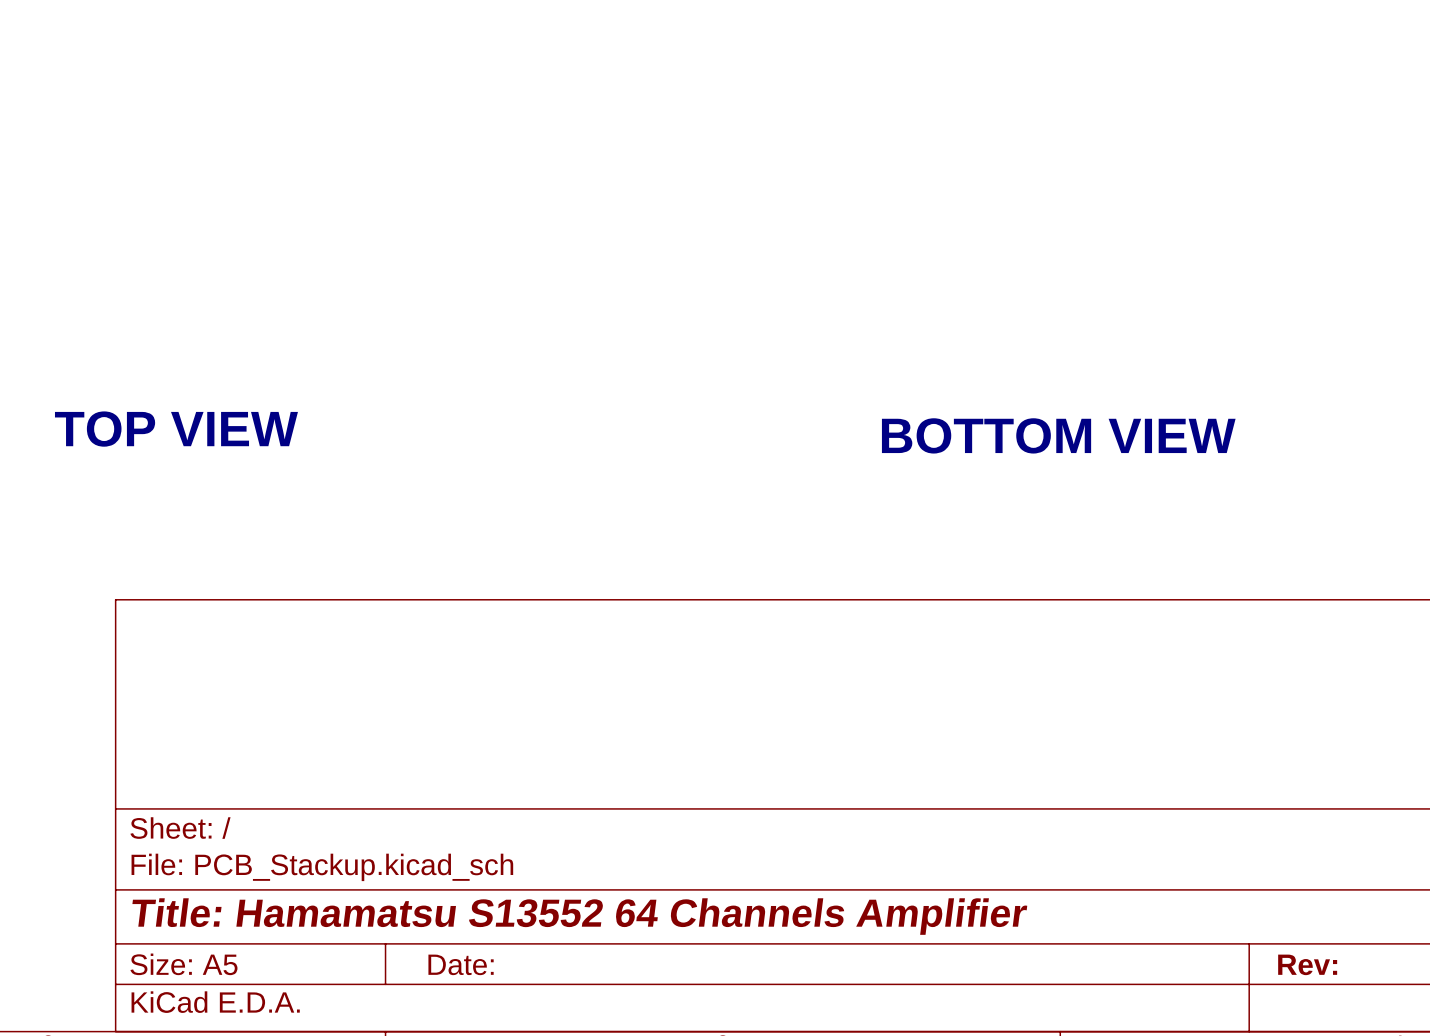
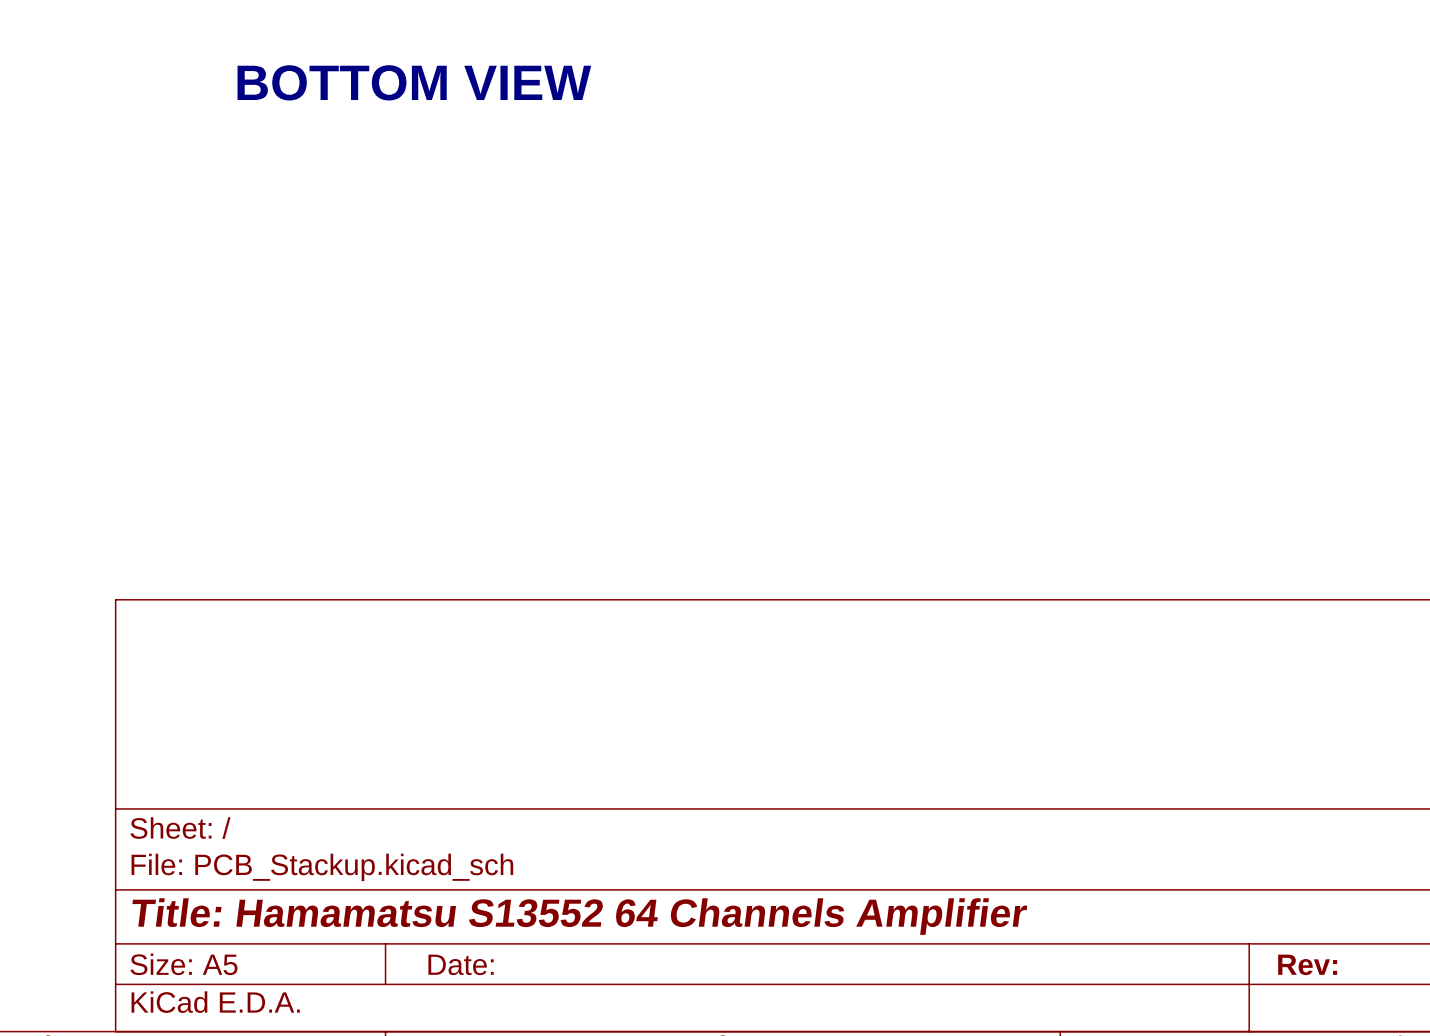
text: none -> BOTTOM VIEW (414, 82)
text: TOP VIEW (176, 429) -> none
text: BOTTOM VIEW (1058, 435) -> none

